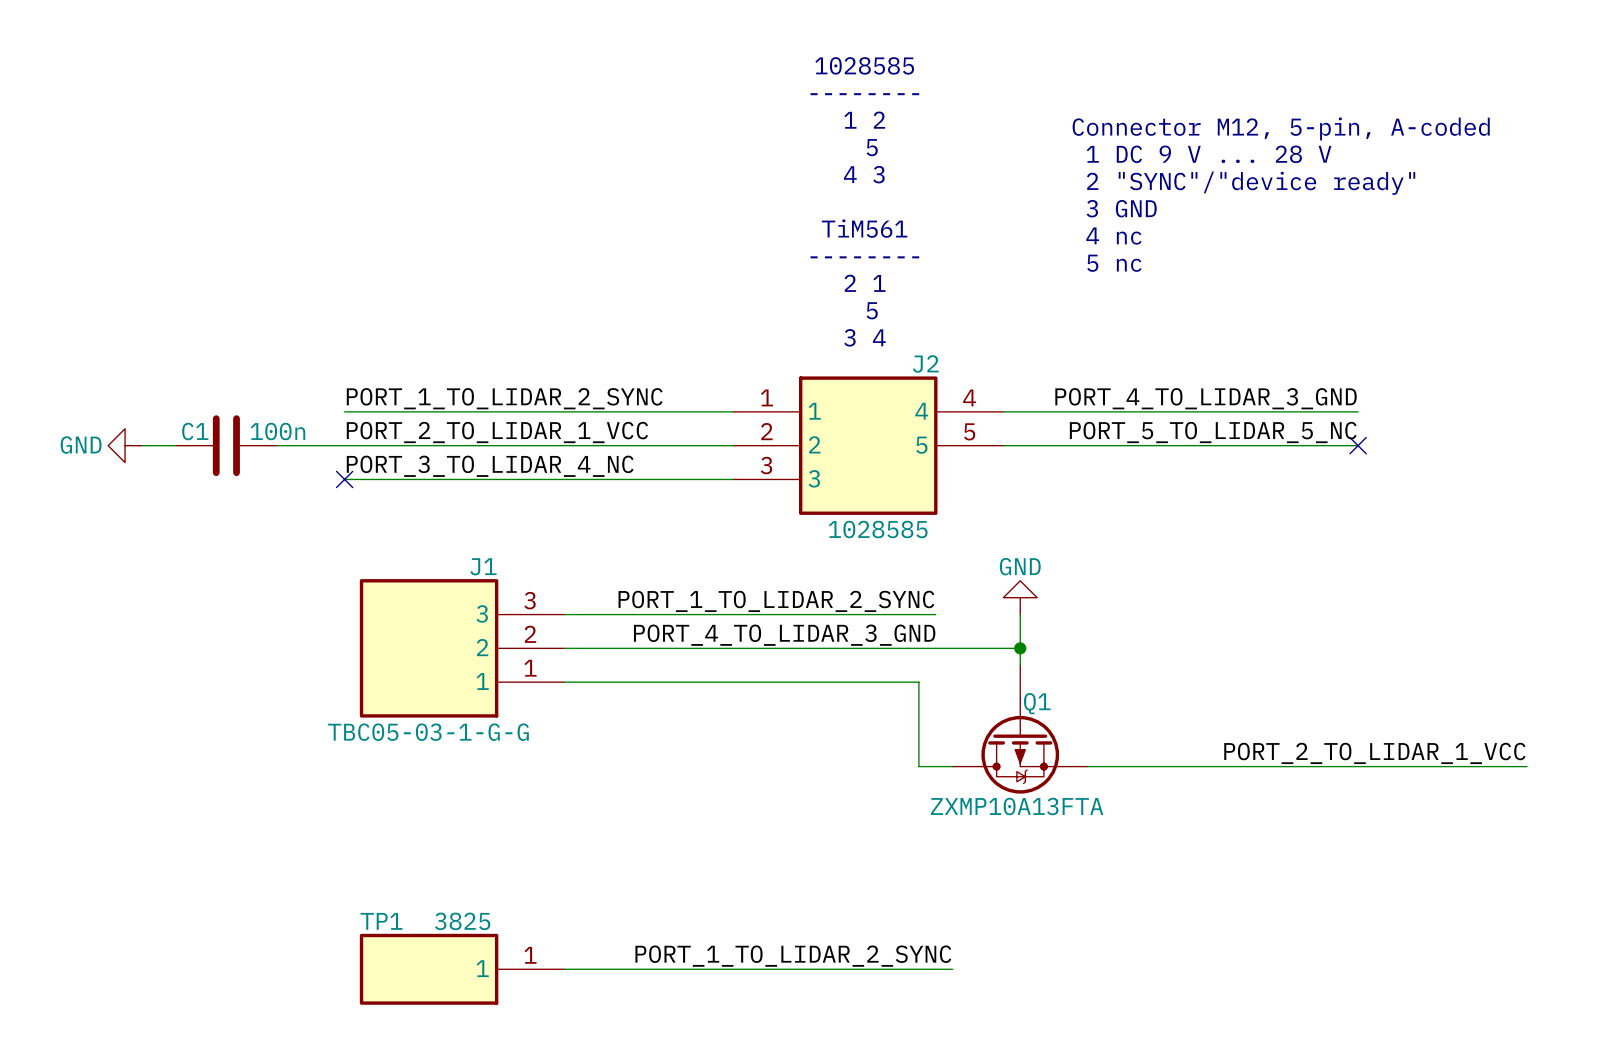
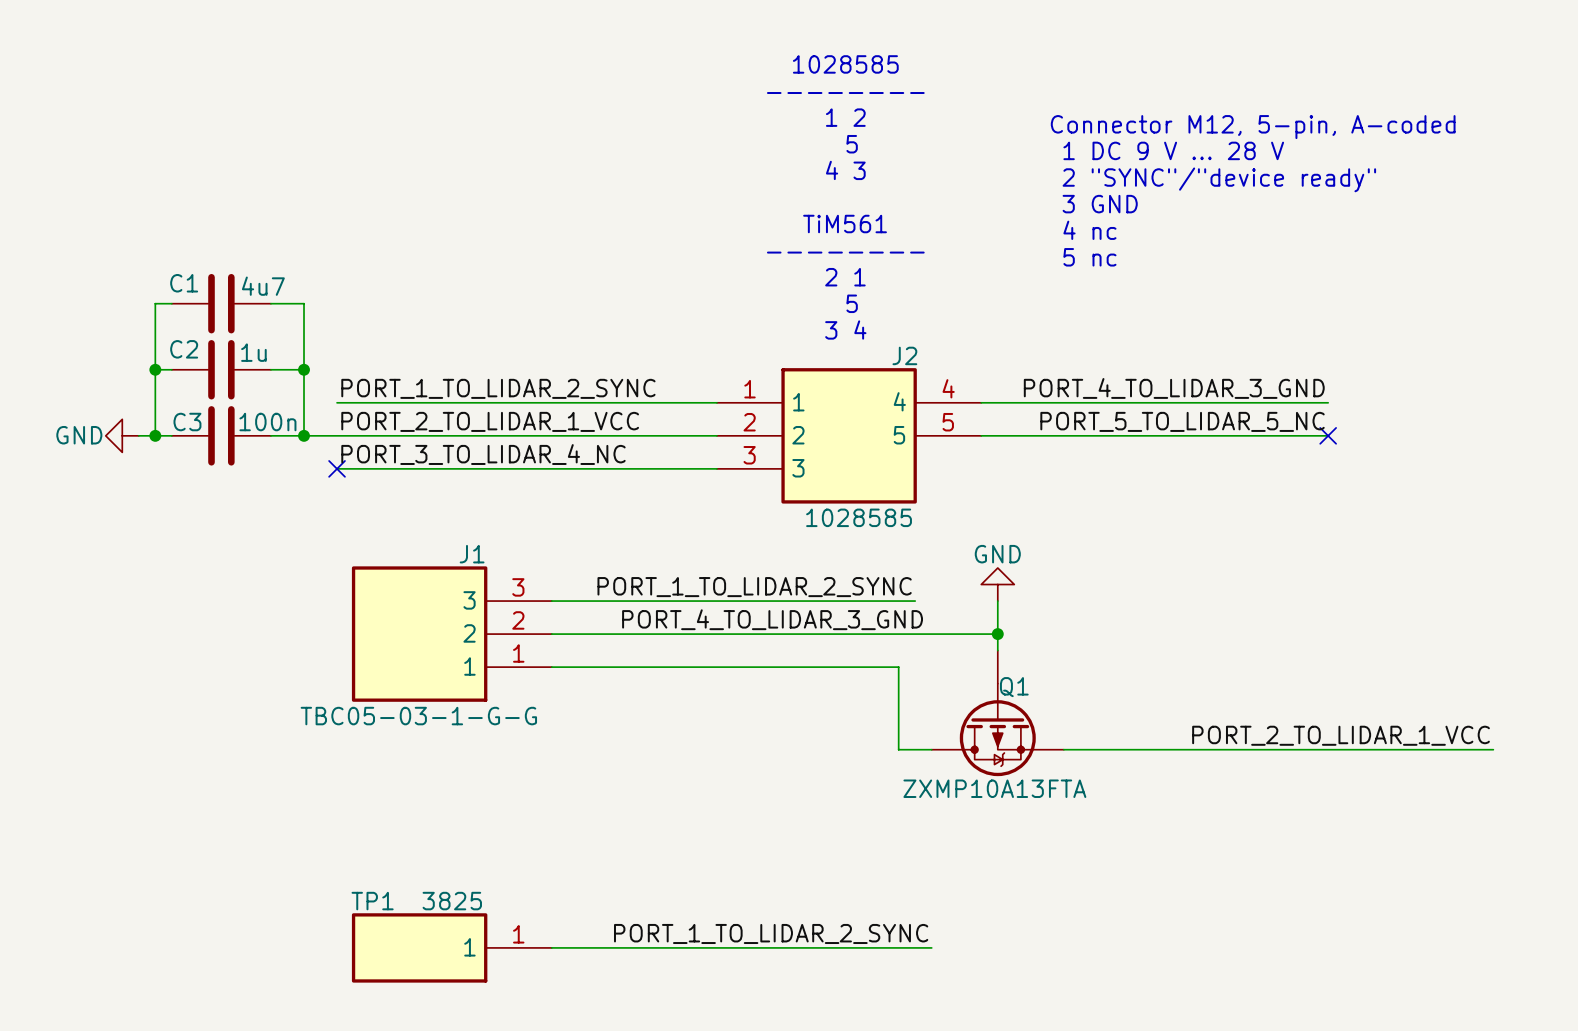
wire: none -> (171, 303) (155, 303) (155, 435)
C1: none -> 4u7 (221, 303)
wire: none -> (270, 303) (304, 303) (304, 435)
wire: none -> (155, 369) (171, 369)
junction: none -> (155, 369)
C2: none -> 1u (221, 369)
wire: none -> (270, 369) (304, 369)
junction: none -> (304, 369)
C1 name: C1 (195, 431) -> C3 (187, 422)
junction: none -> (155, 435)
junction: none -> (304, 435)

